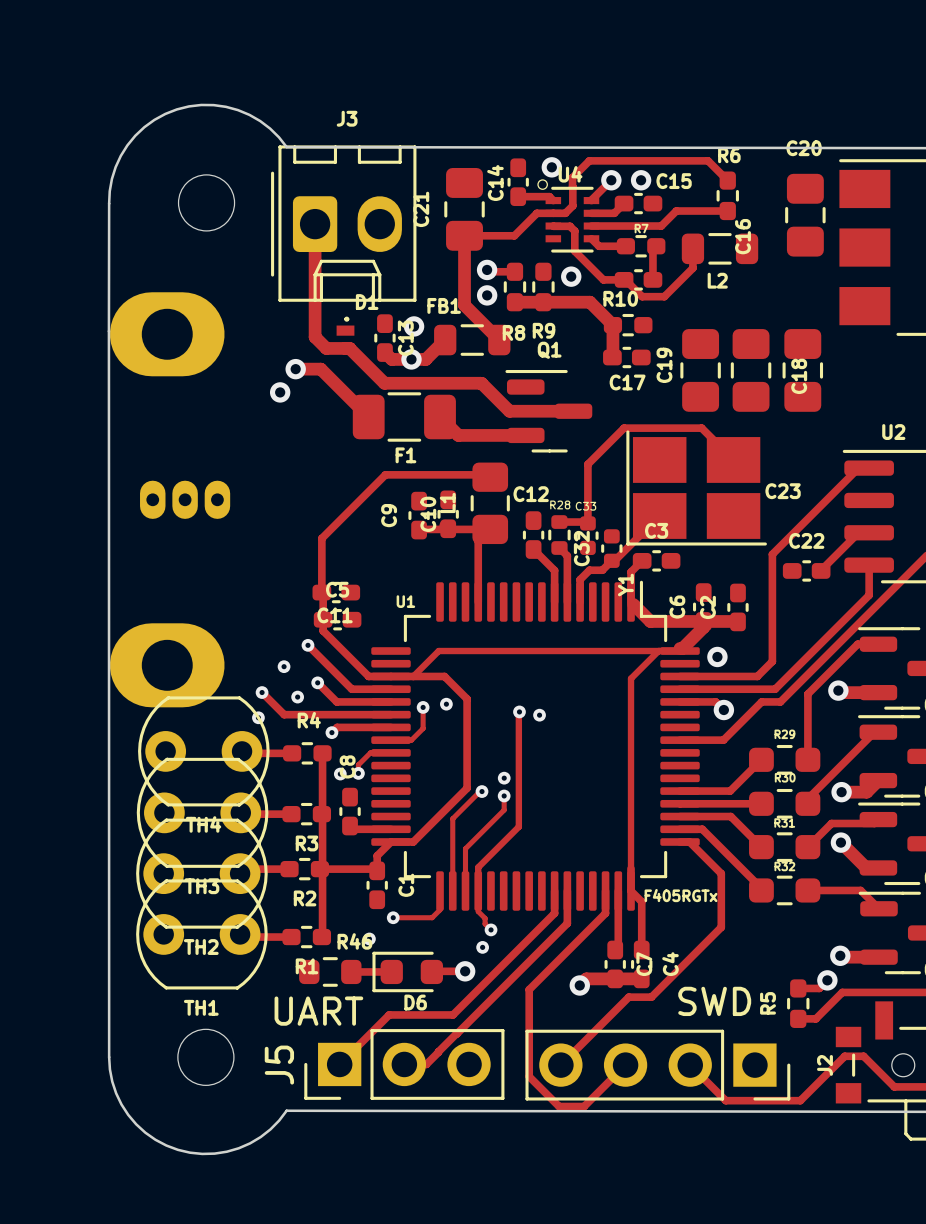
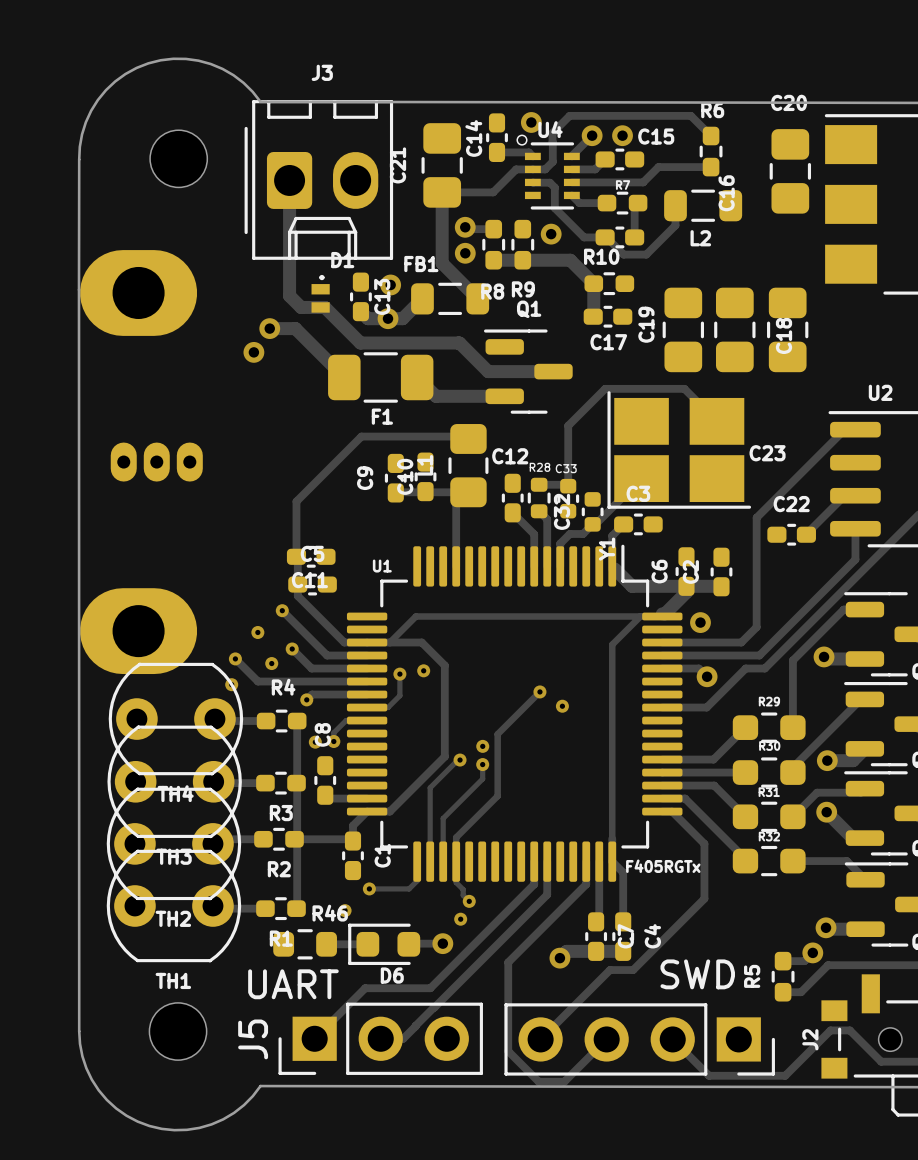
track: (519, 711) (518, 766) -> (539, 691) (497, 734)
via: (519, 711) -> none
via: (539, 715) -> none
via: none -> (539, 691)
via: none -> (562, 706)

